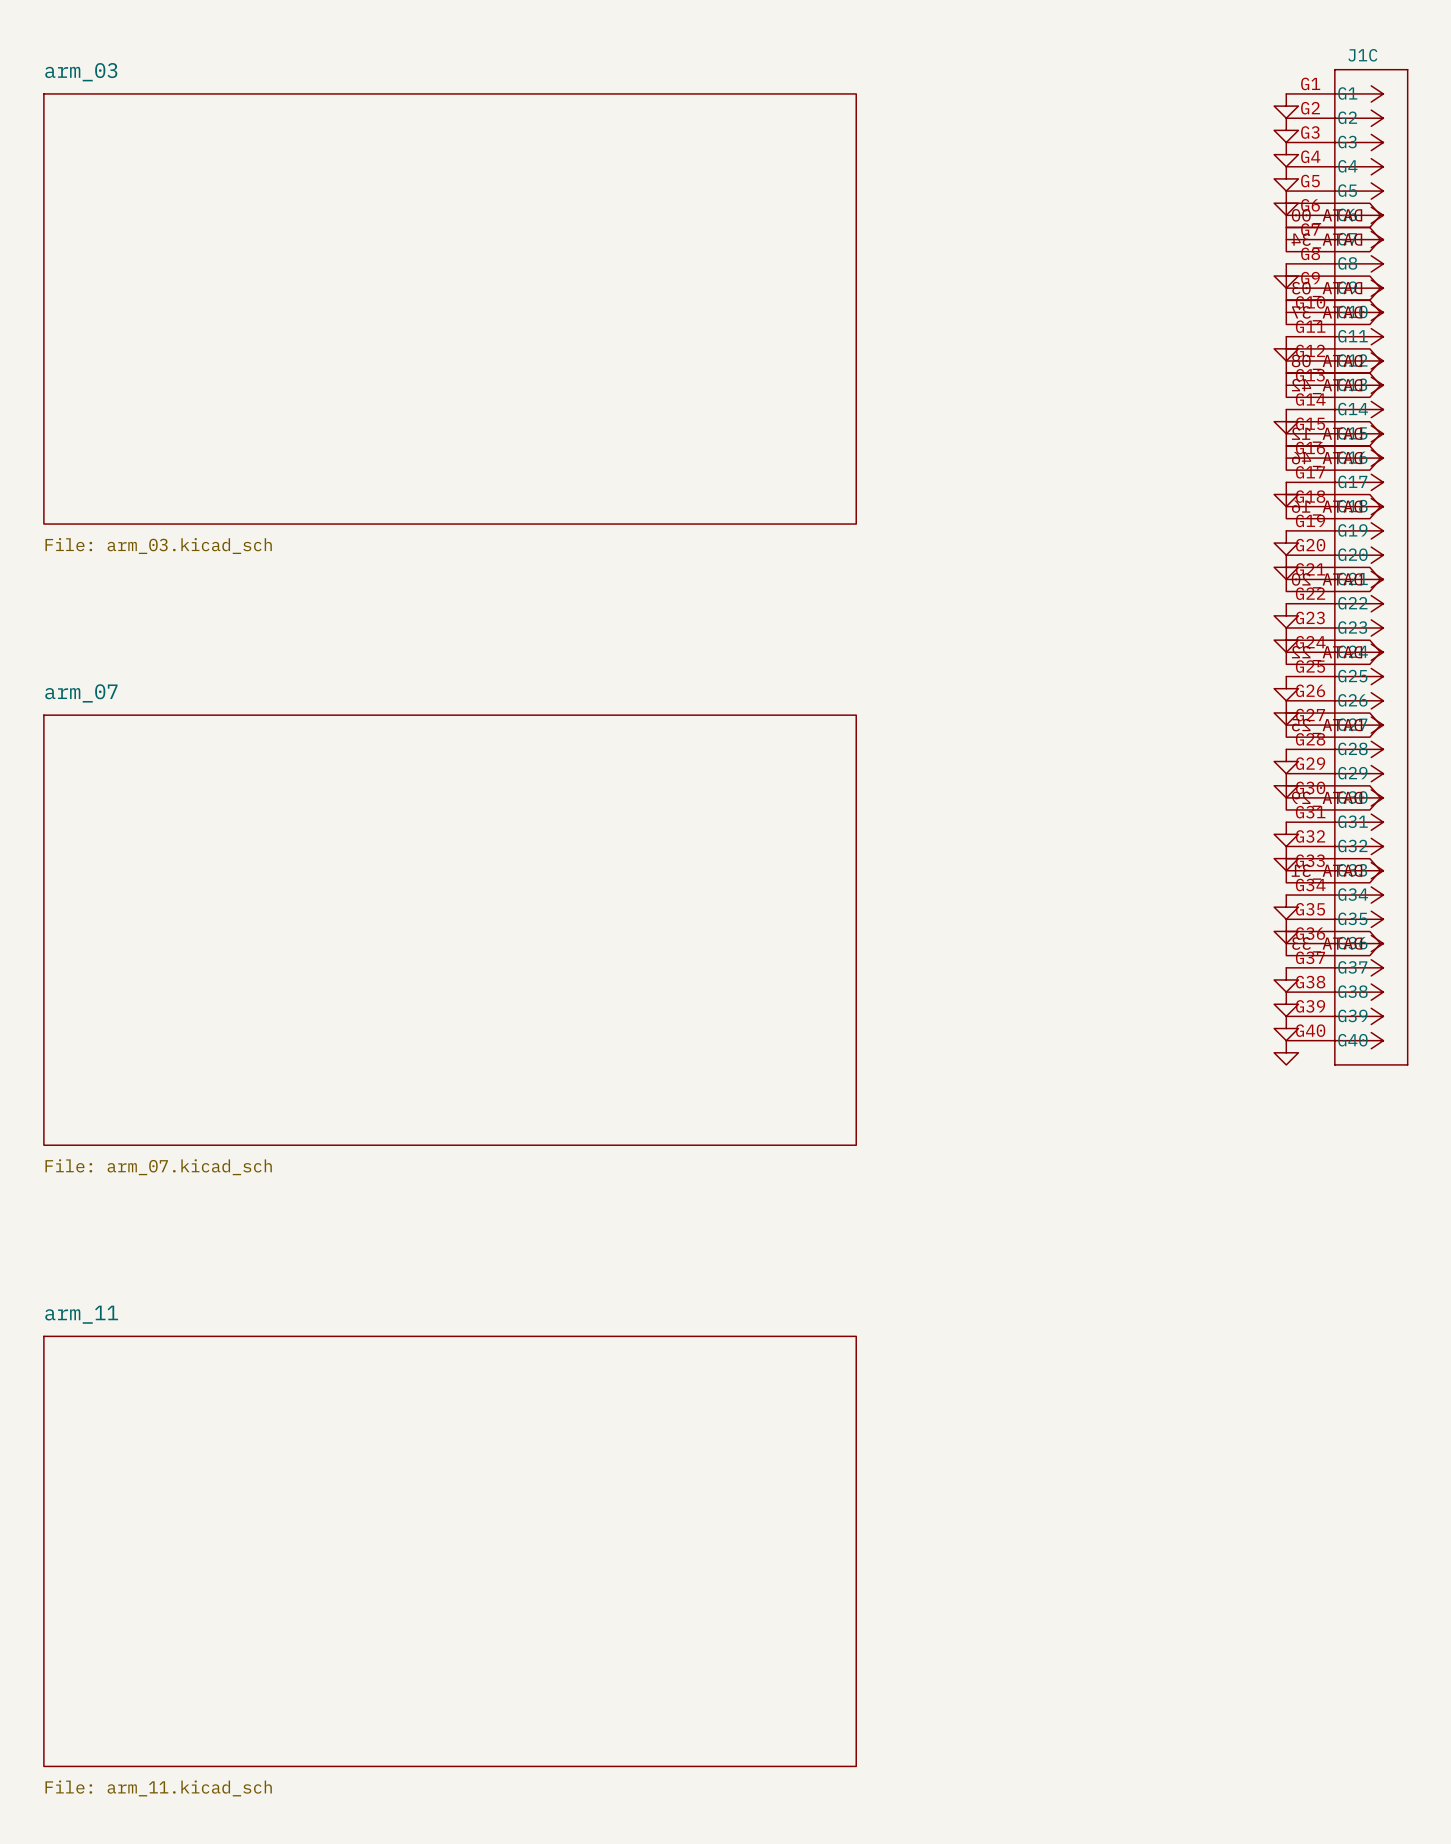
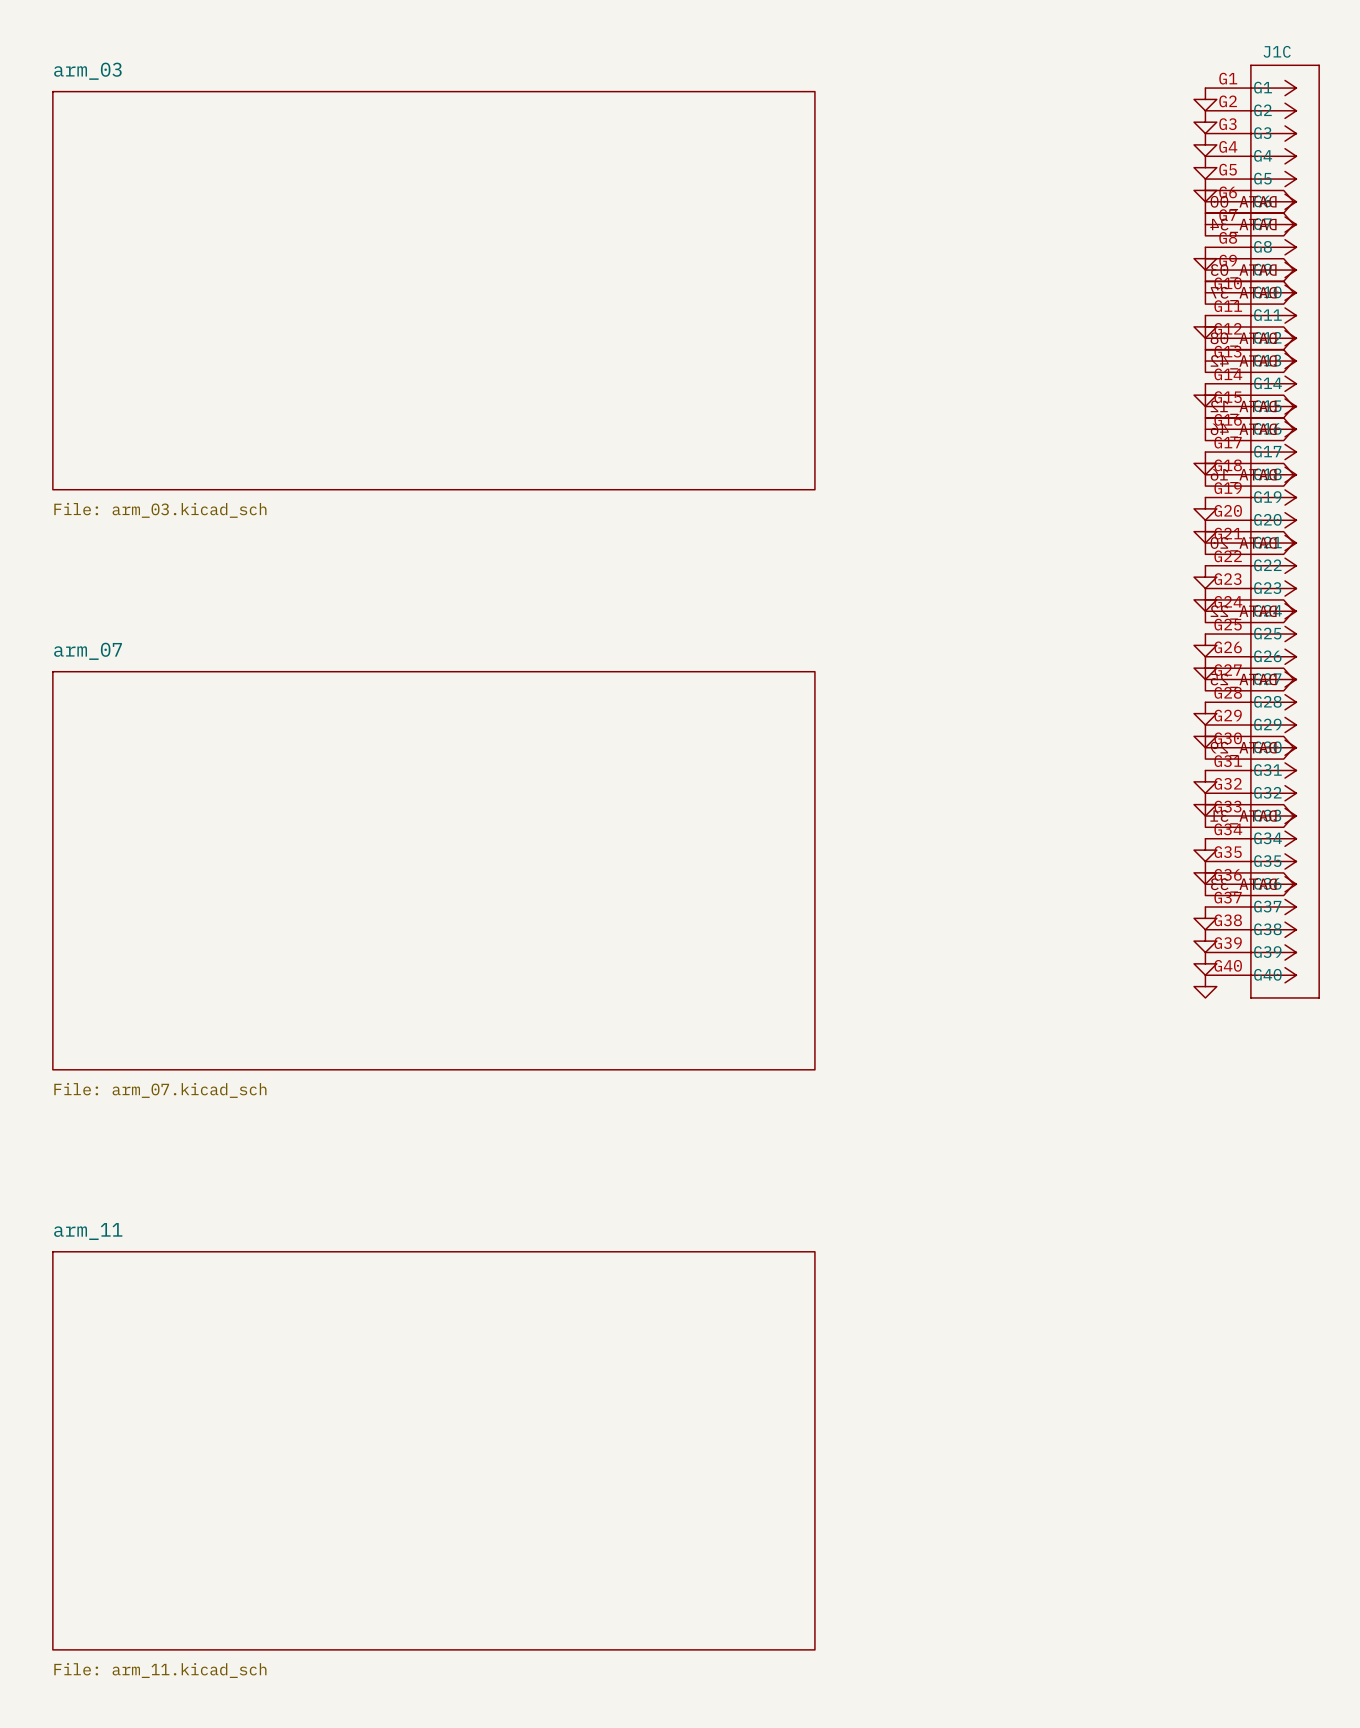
sheet arm_03 shape: [43, 93, 857, 525] -> [52, 90, 816, 491]
sheet arm_07 shape: [43, 714, 857, 1146] -> [52, 671, 816, 1071]
sheet arm_11 shape: [43, 1335, 857, 1768] -> [52, 1251, 816, 1651]

